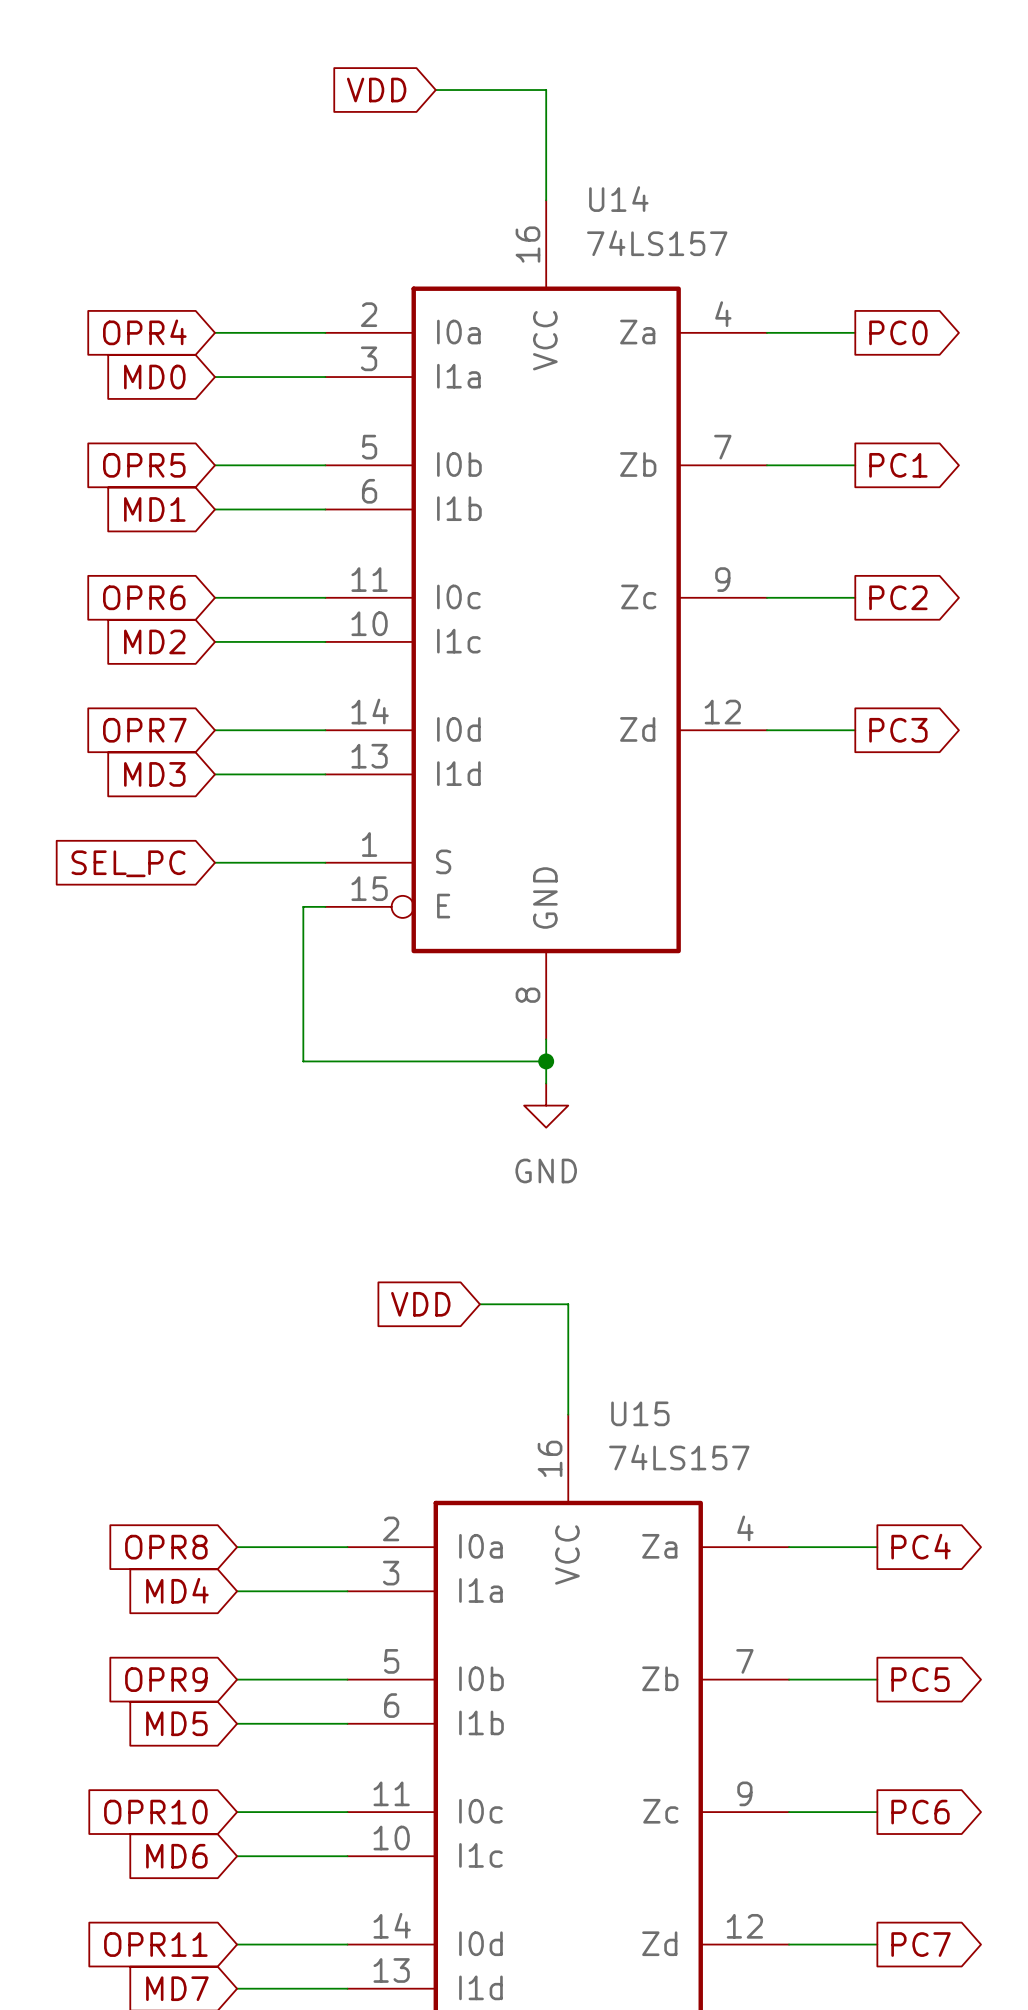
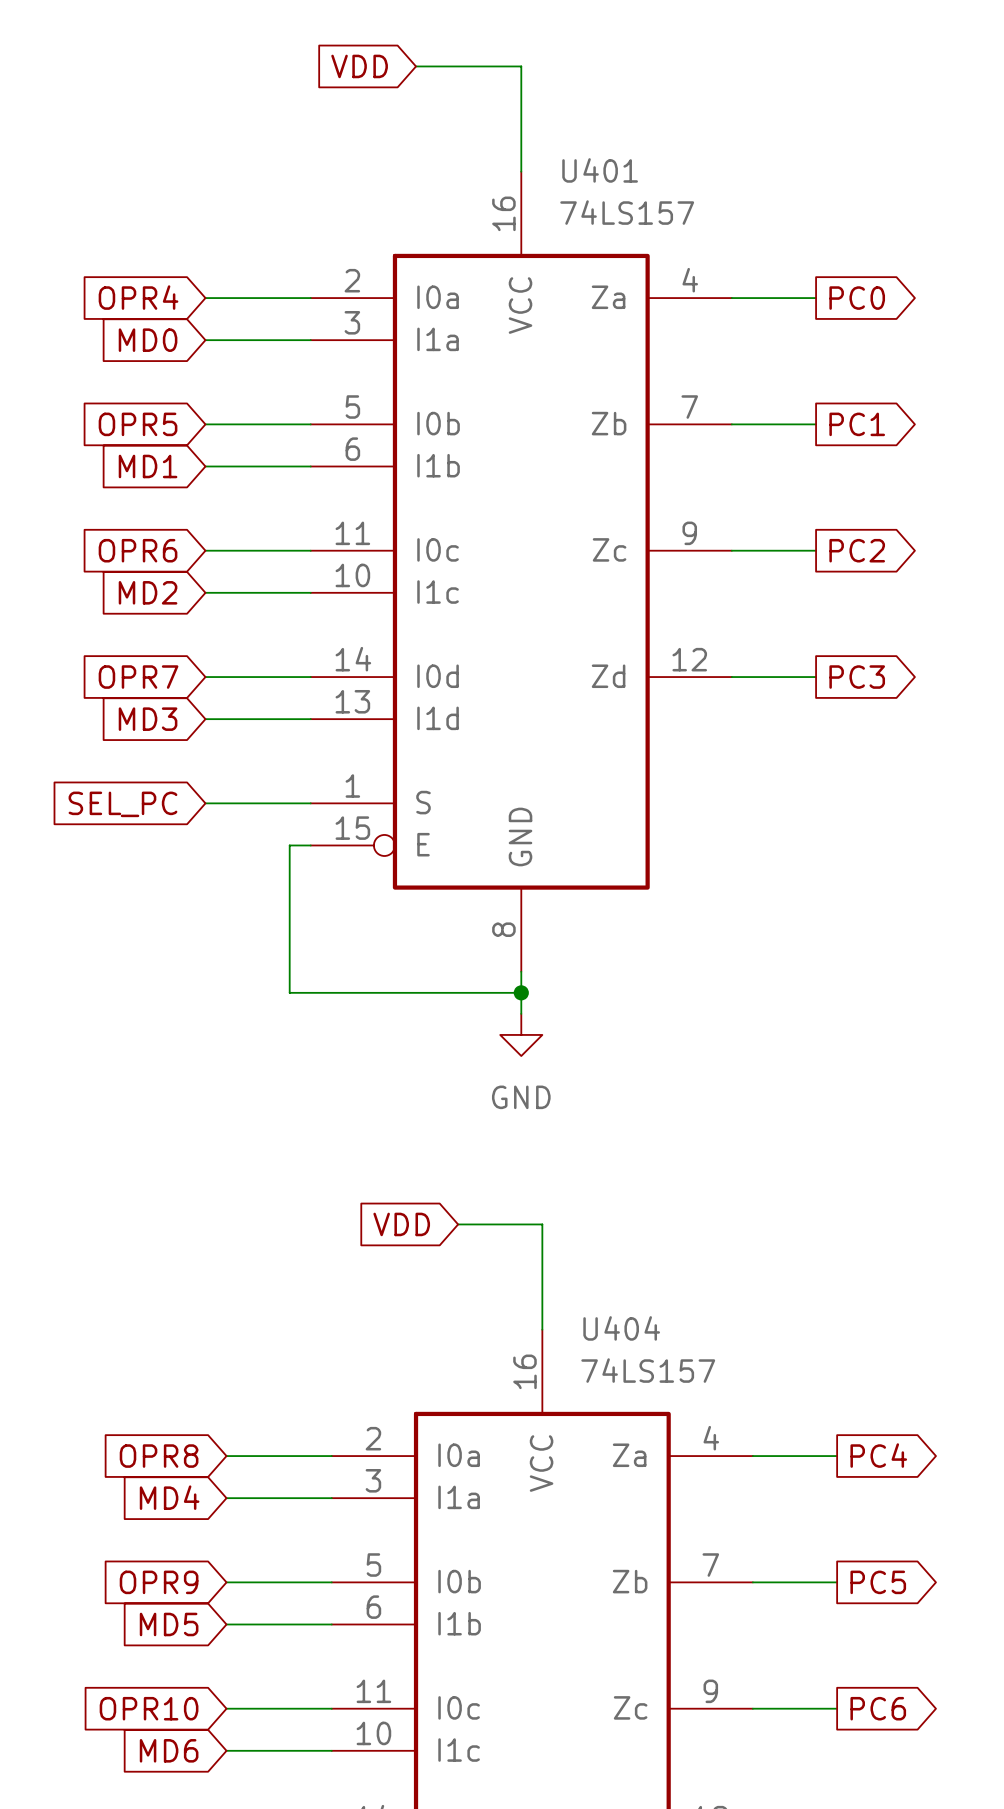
U14 name: U14 (618, 199) -> U401 (600, 170)
U15 name: U15 (640, 1413) -> U404 (621, 1328)

